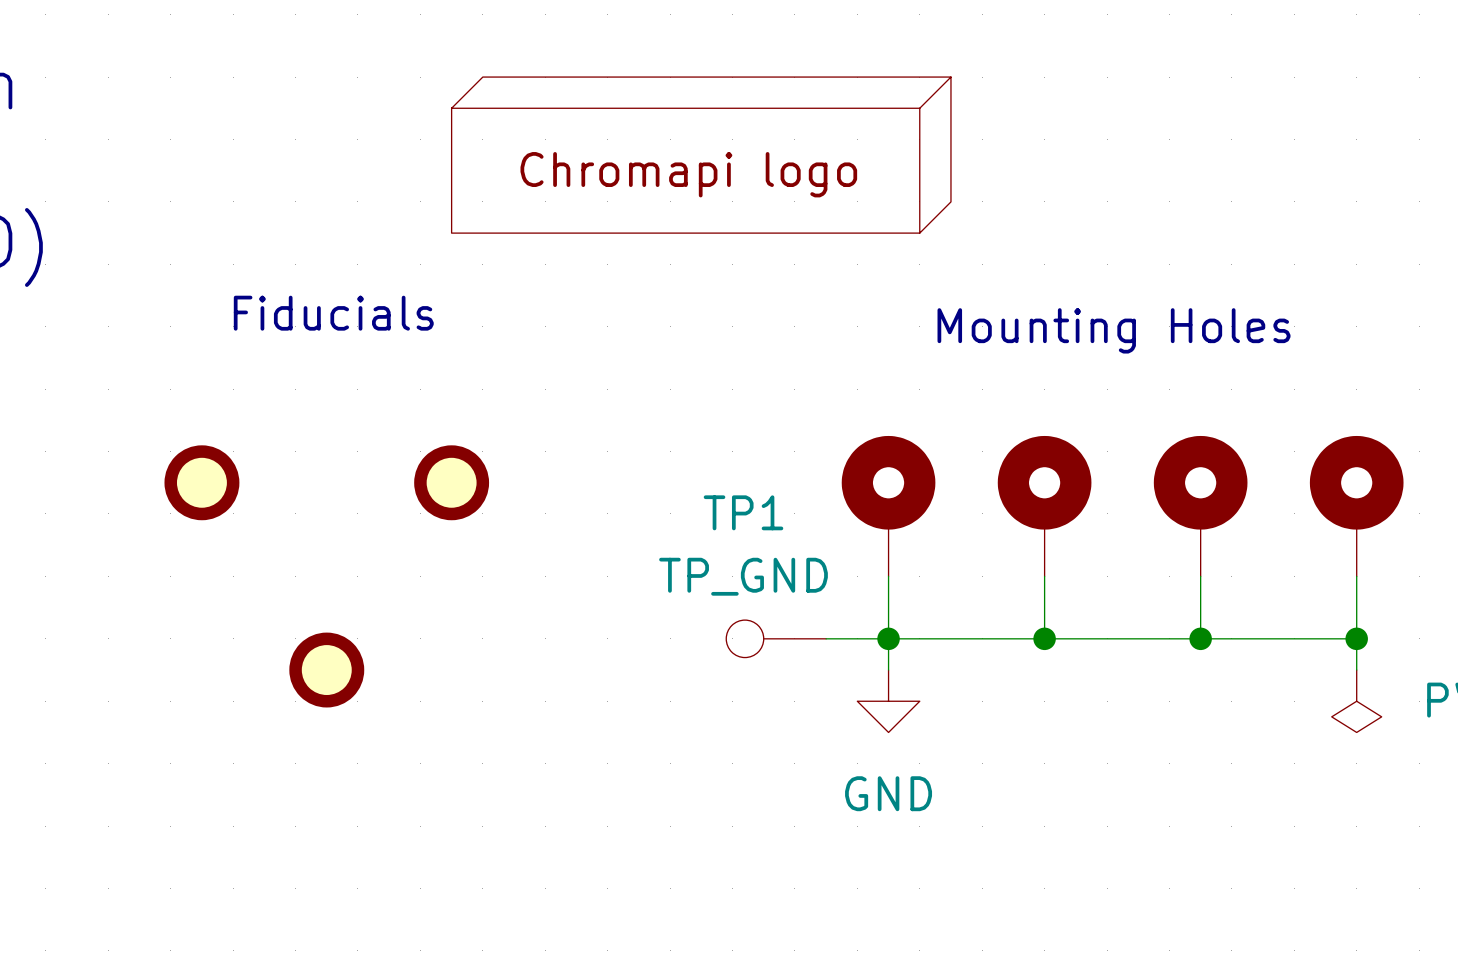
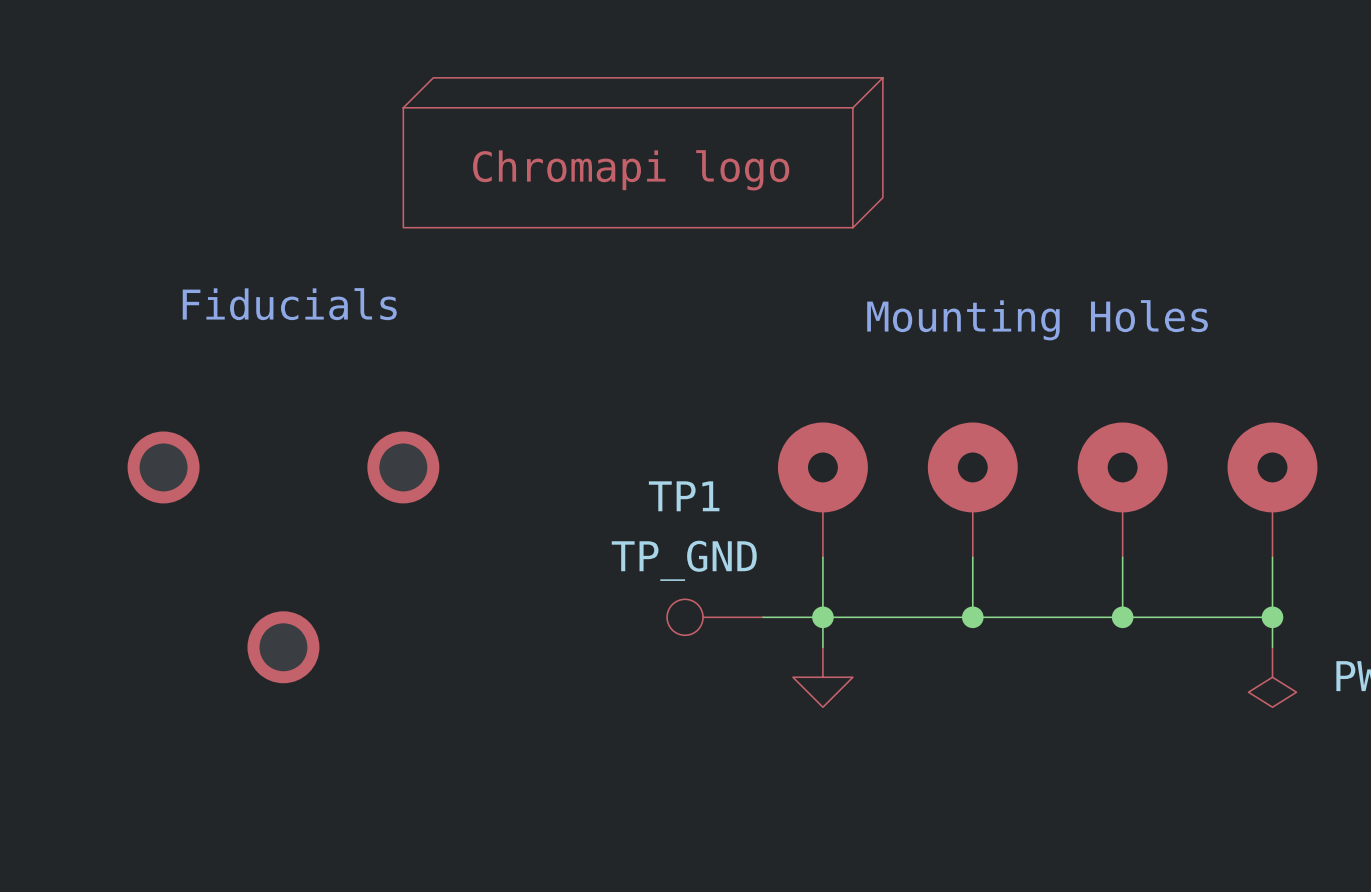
power symbol text: GND (888, 793) -> none

